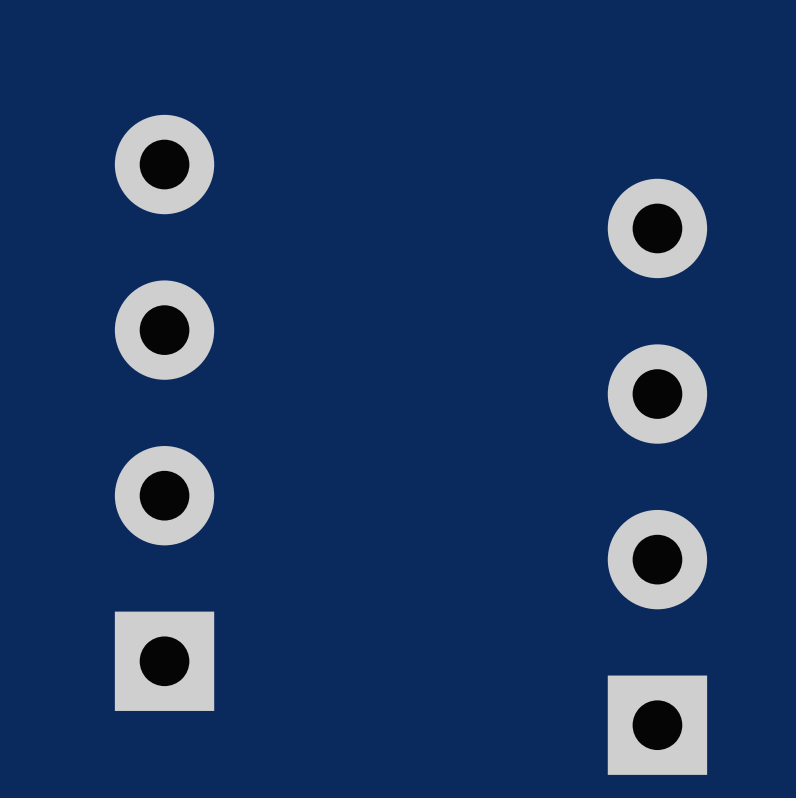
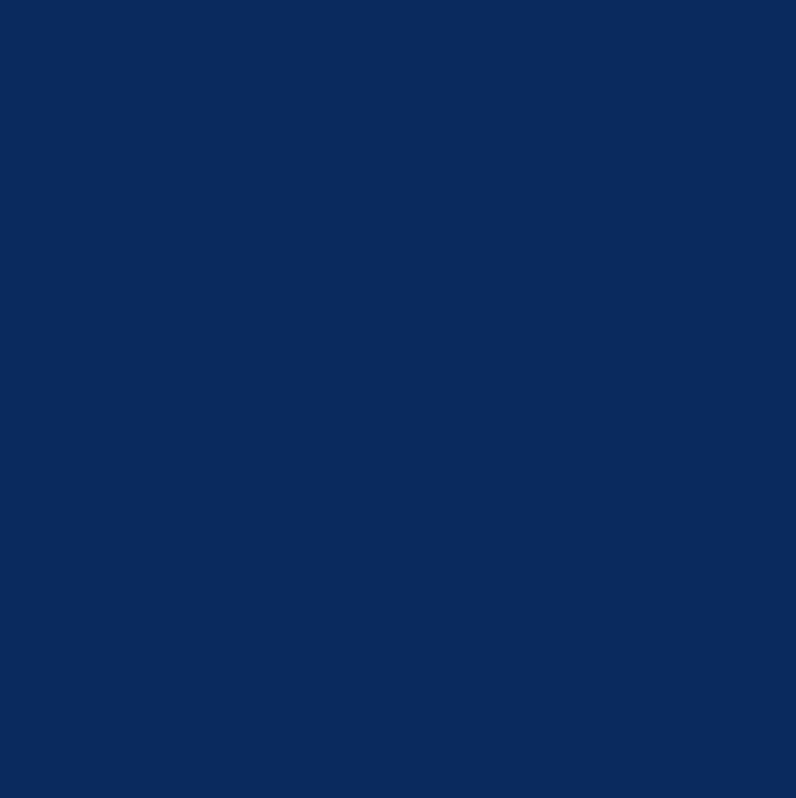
part: (164, 412) -> none
part: (657, 476) -> none

